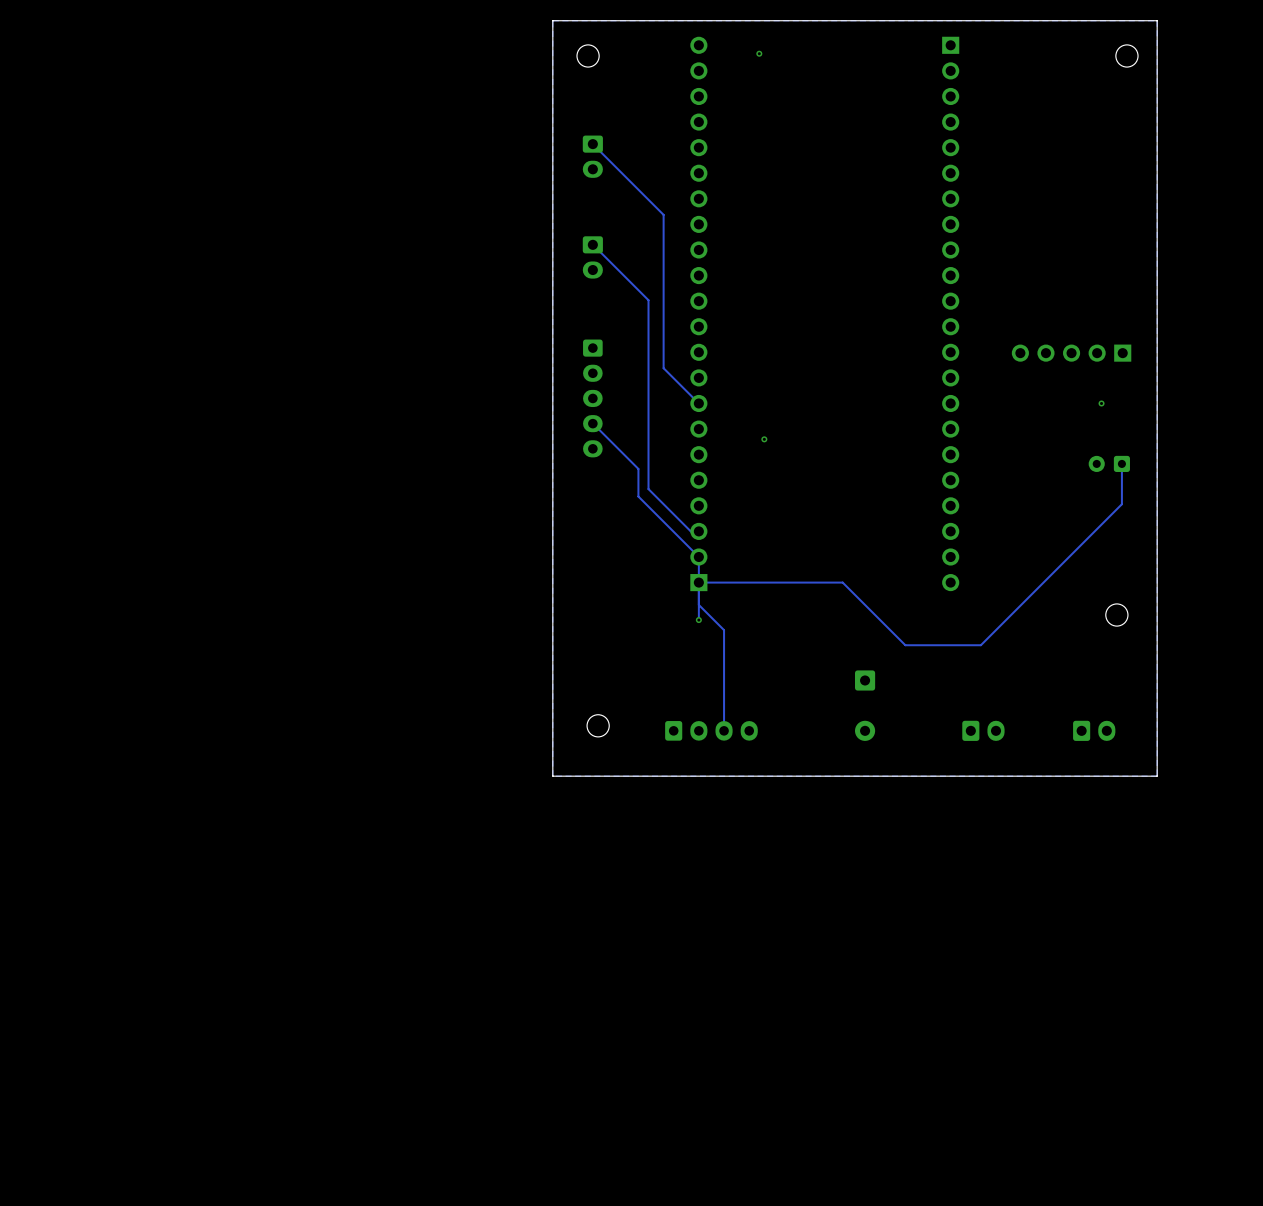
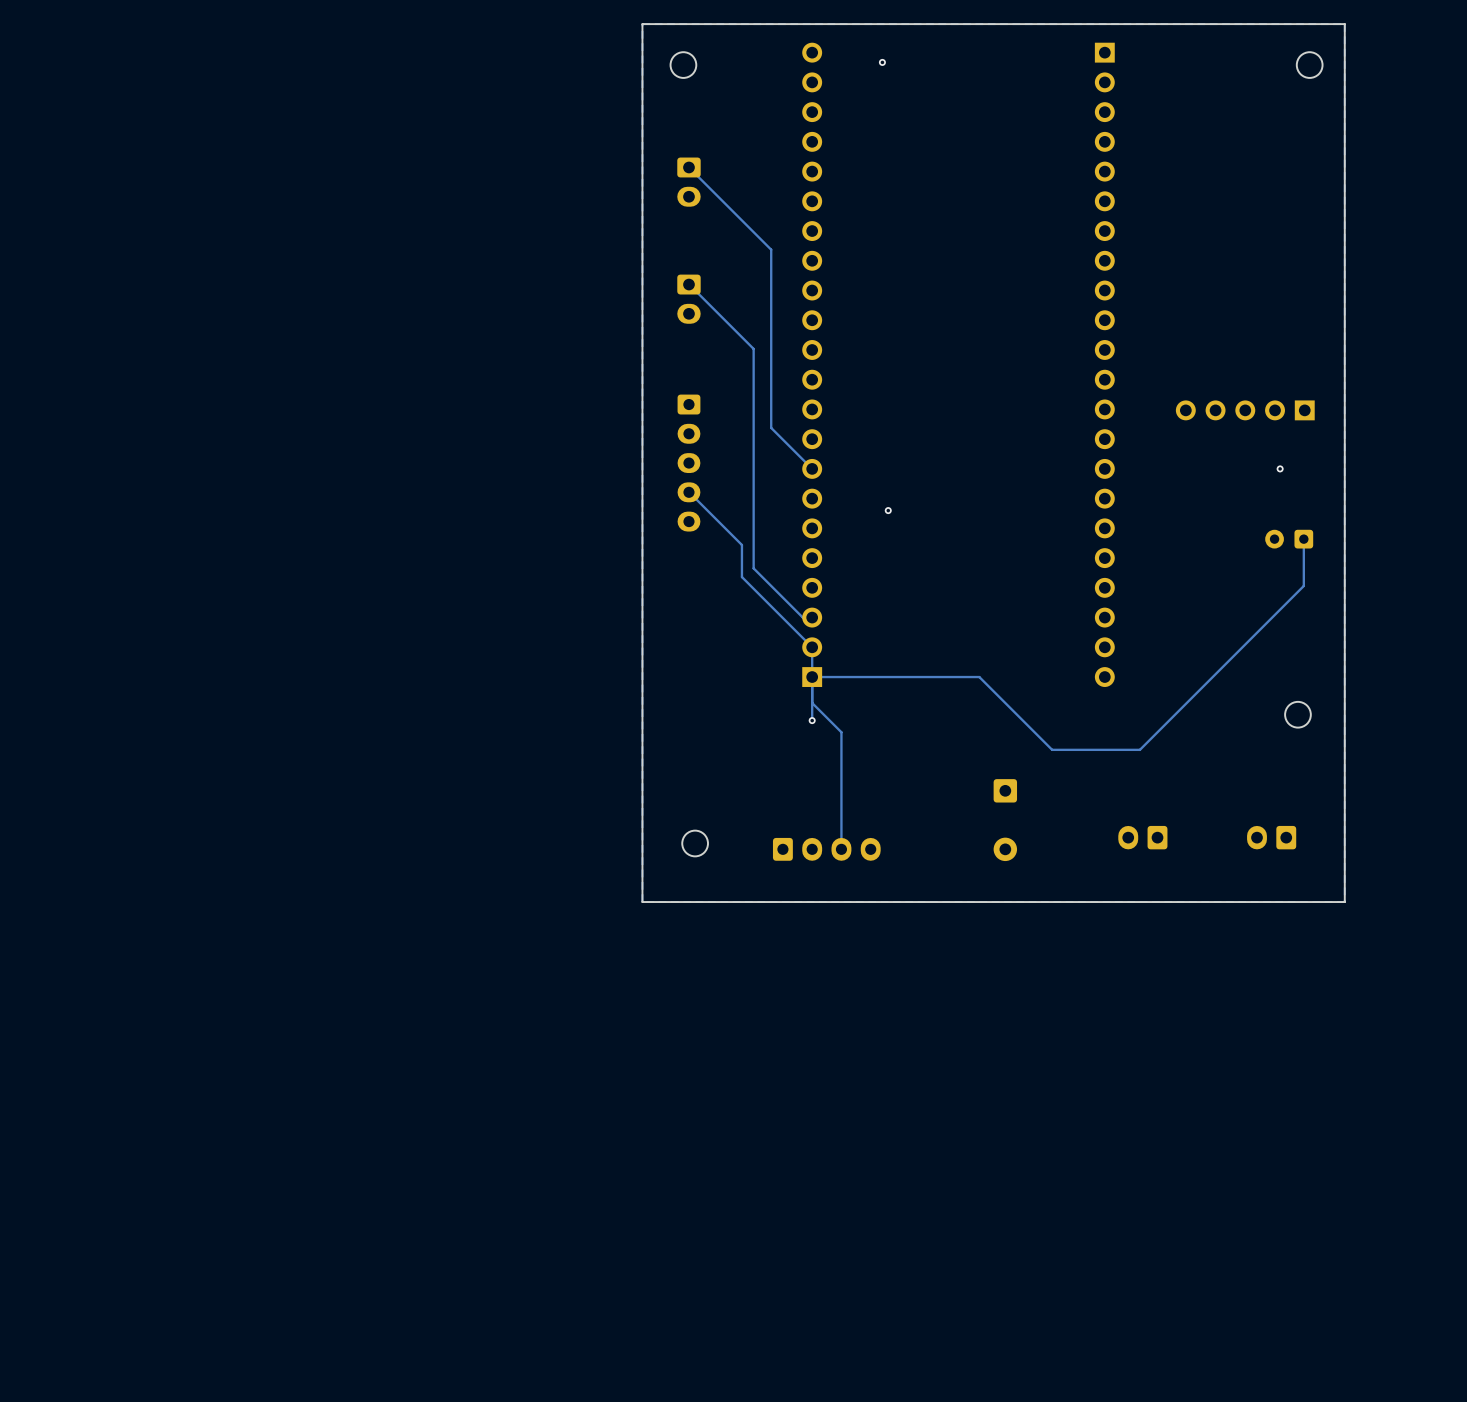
part rotation: 0° (983, 730) -> 180° (1142, 837)
part rotation: 0° (1094, 730) -> 180° (1271, 837)

